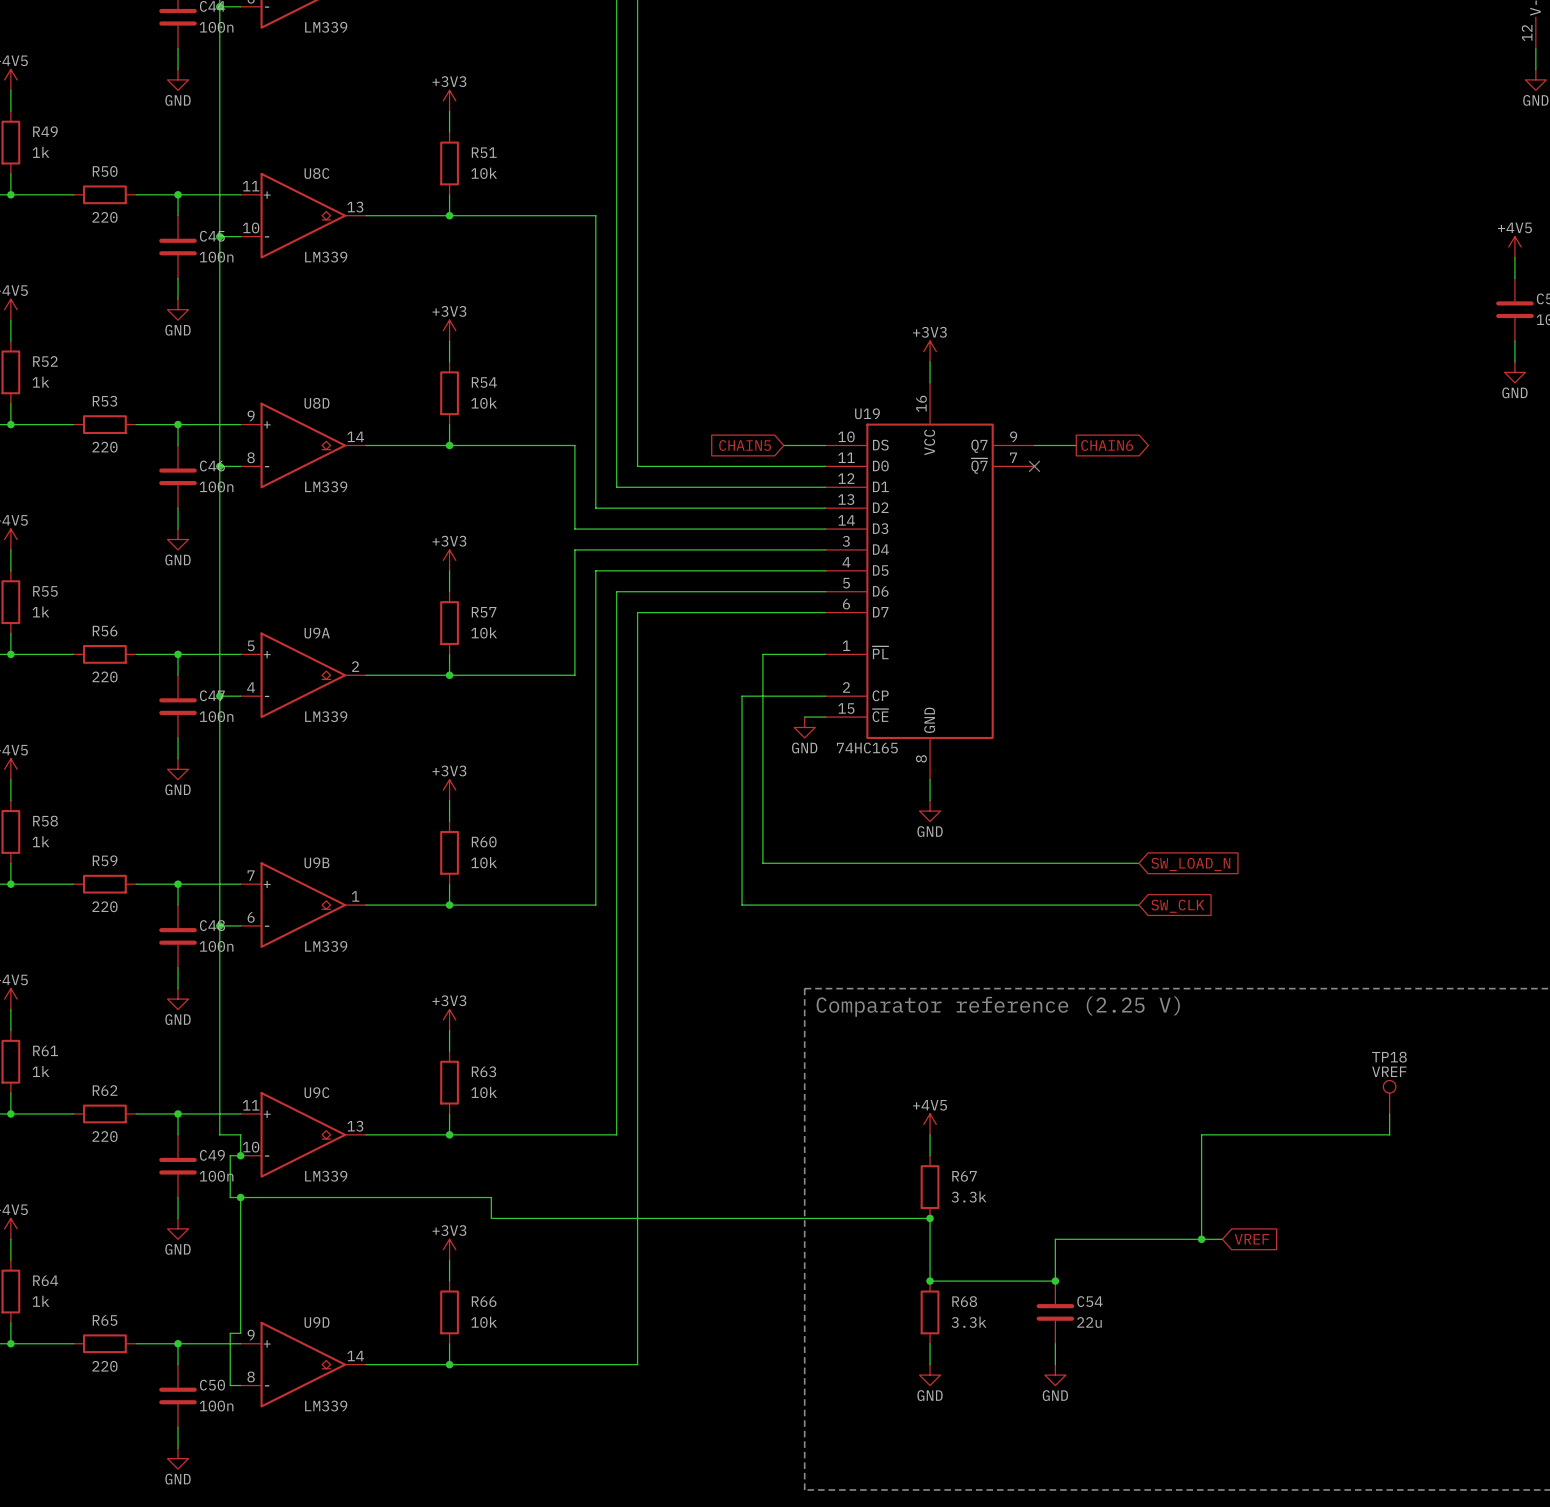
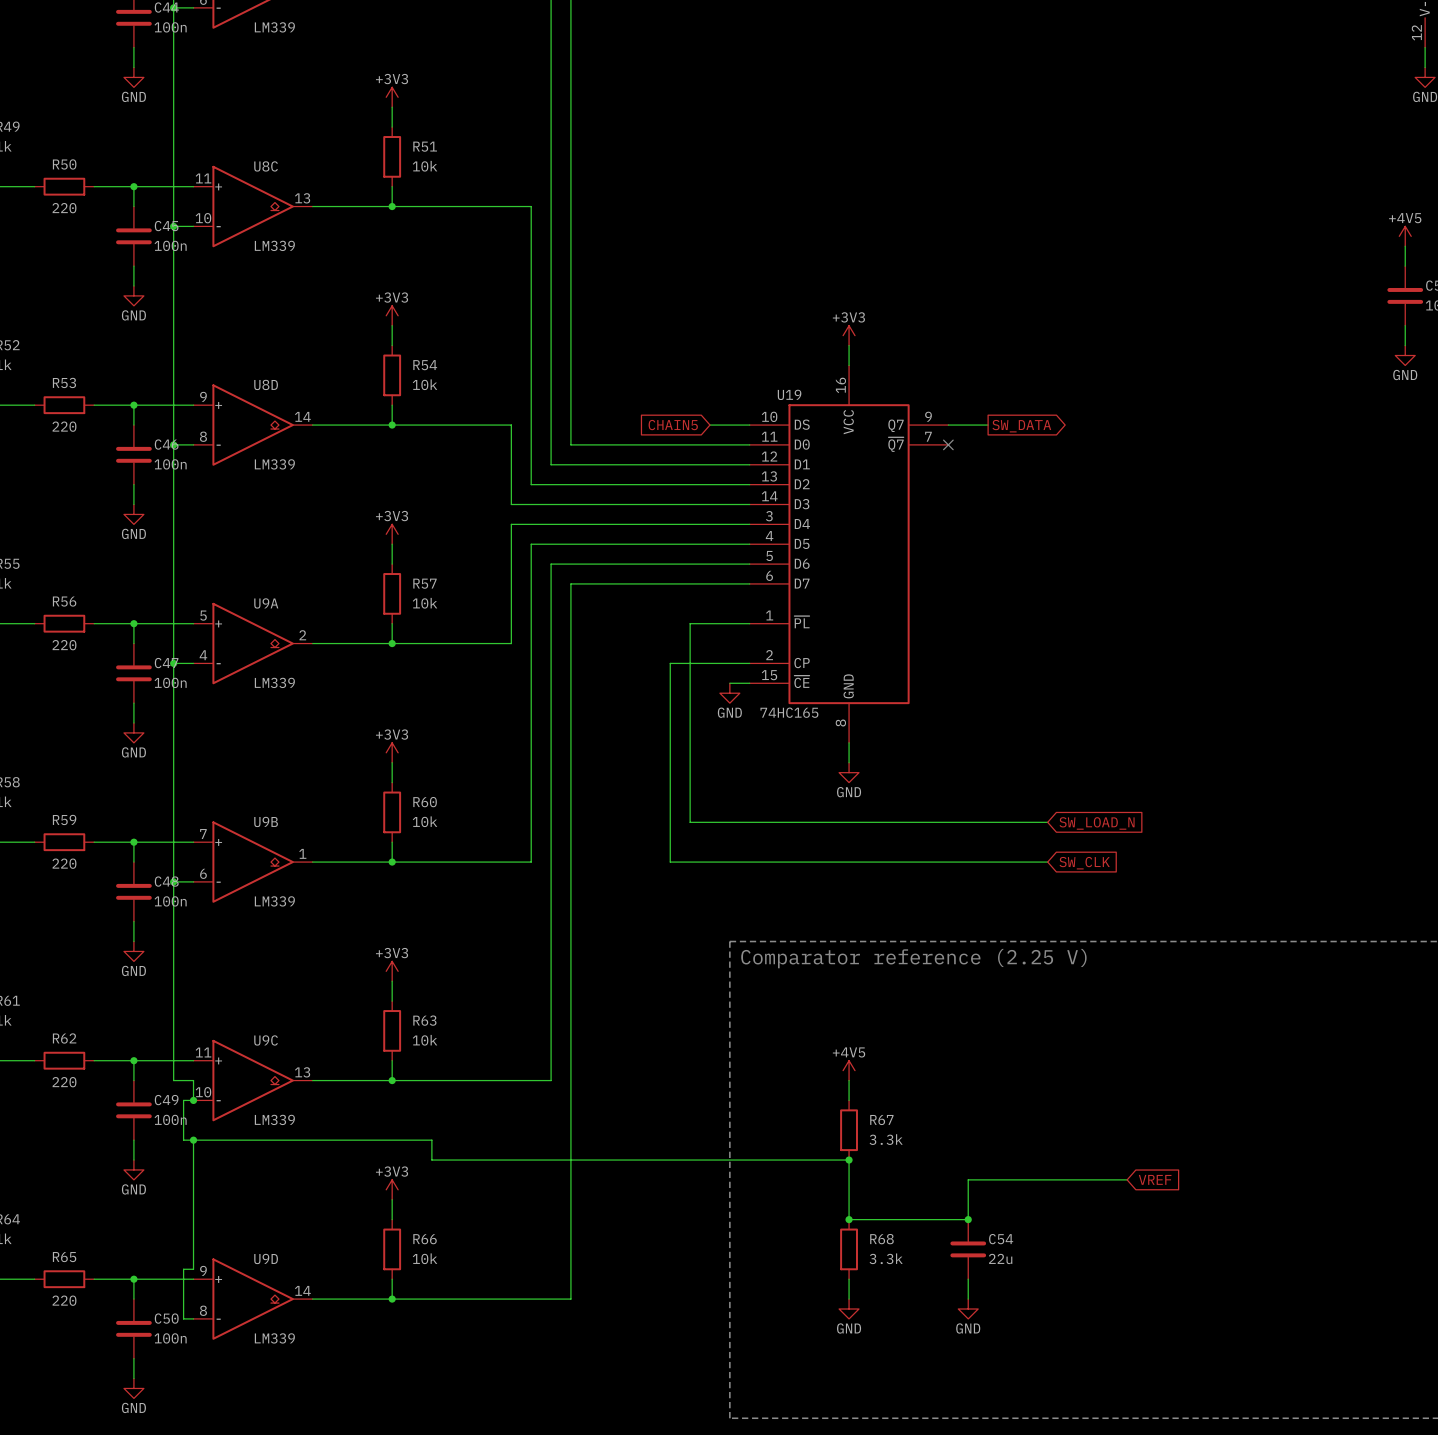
global label: CHAIN6 (1107, 445) -> SW_DATA (1021, 426)
TP18: VREF (1389, 1097) -> none
wire: (1389, 1113) (1389, 1134) (1201, 1134) (1201, 1239) -> none
junction: (1201, 1239) -> none

